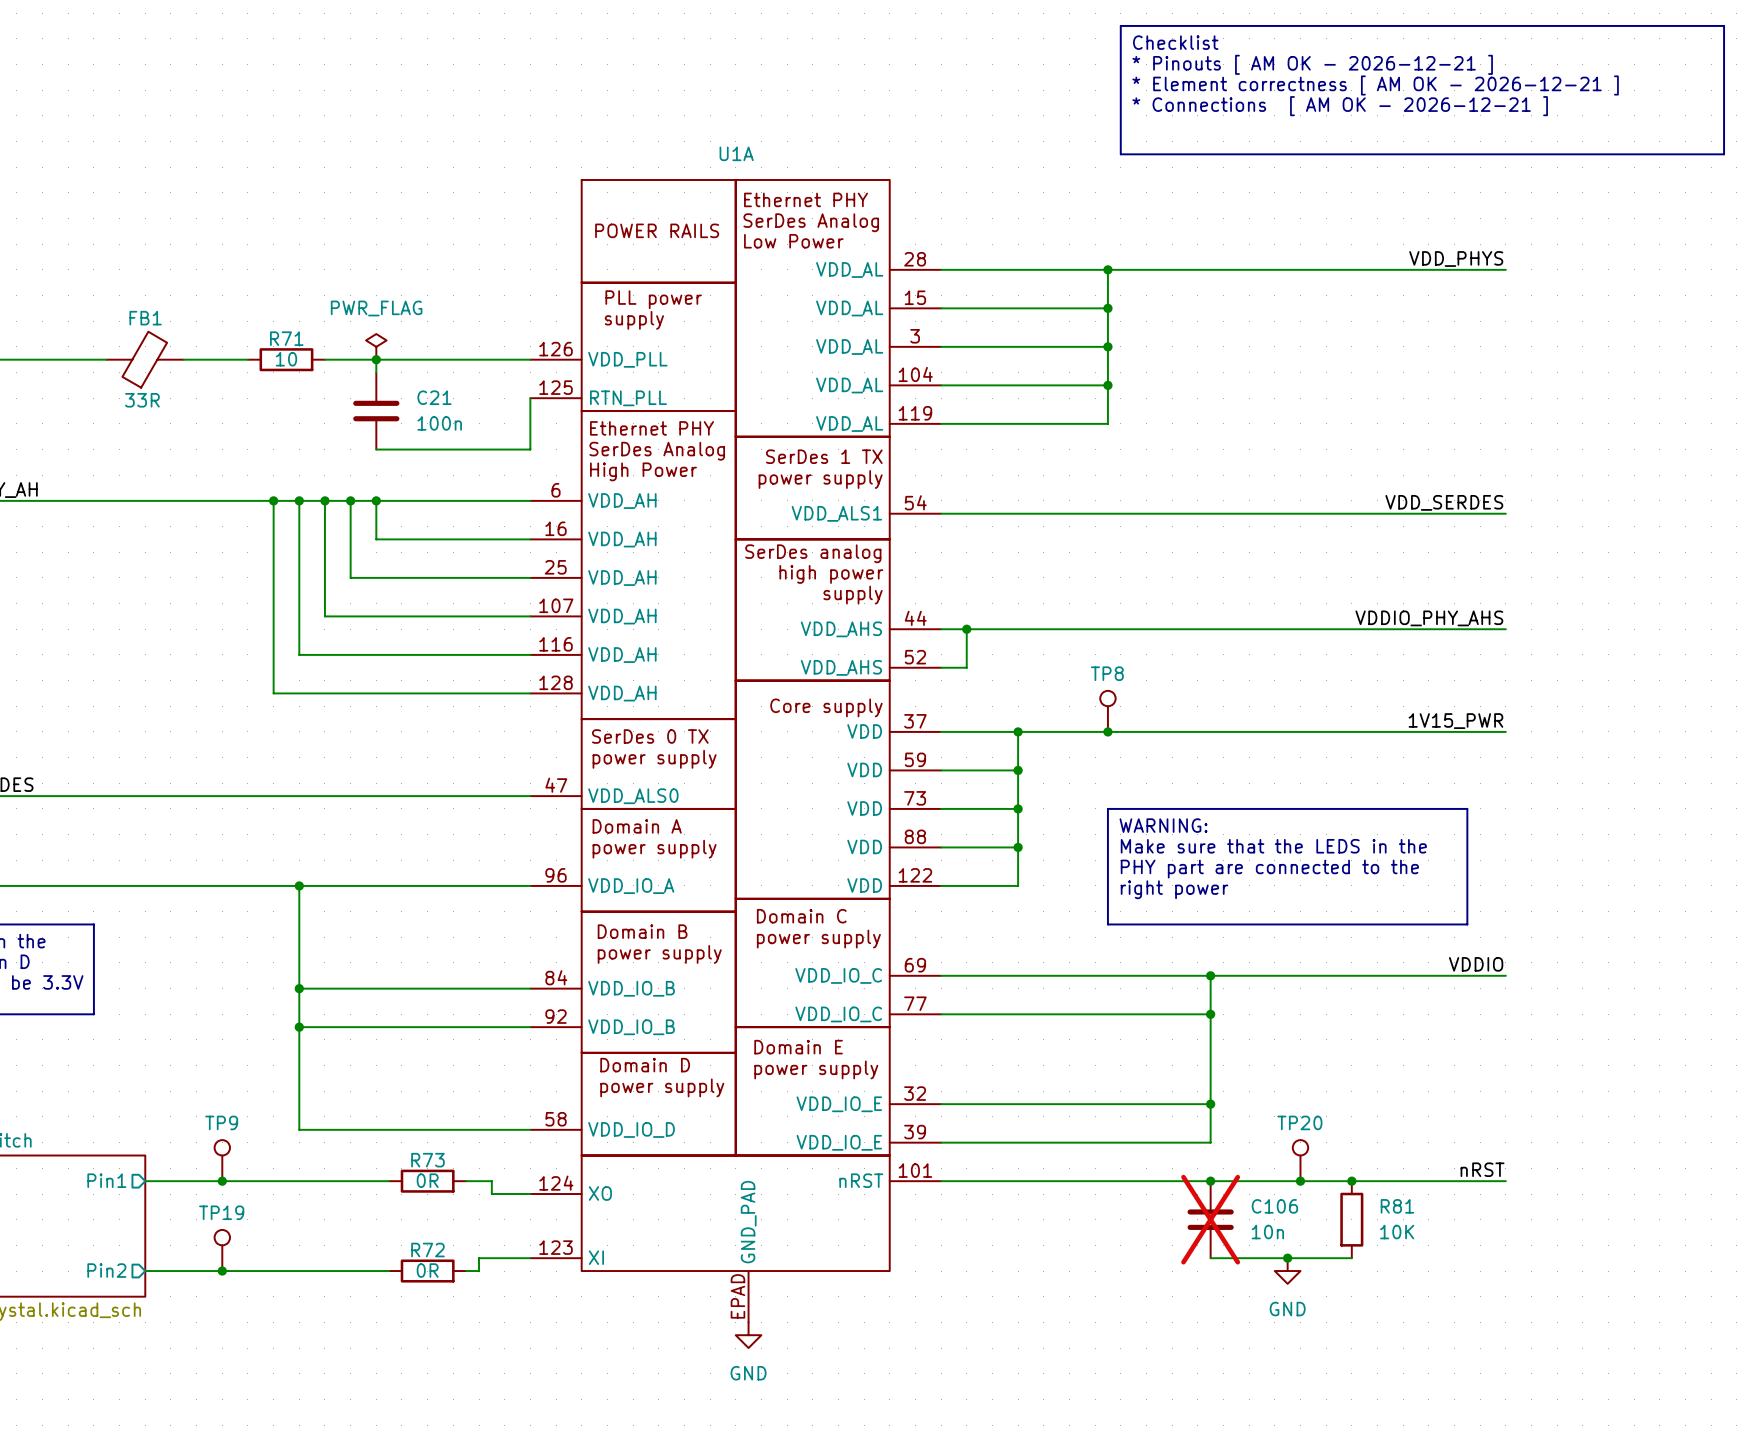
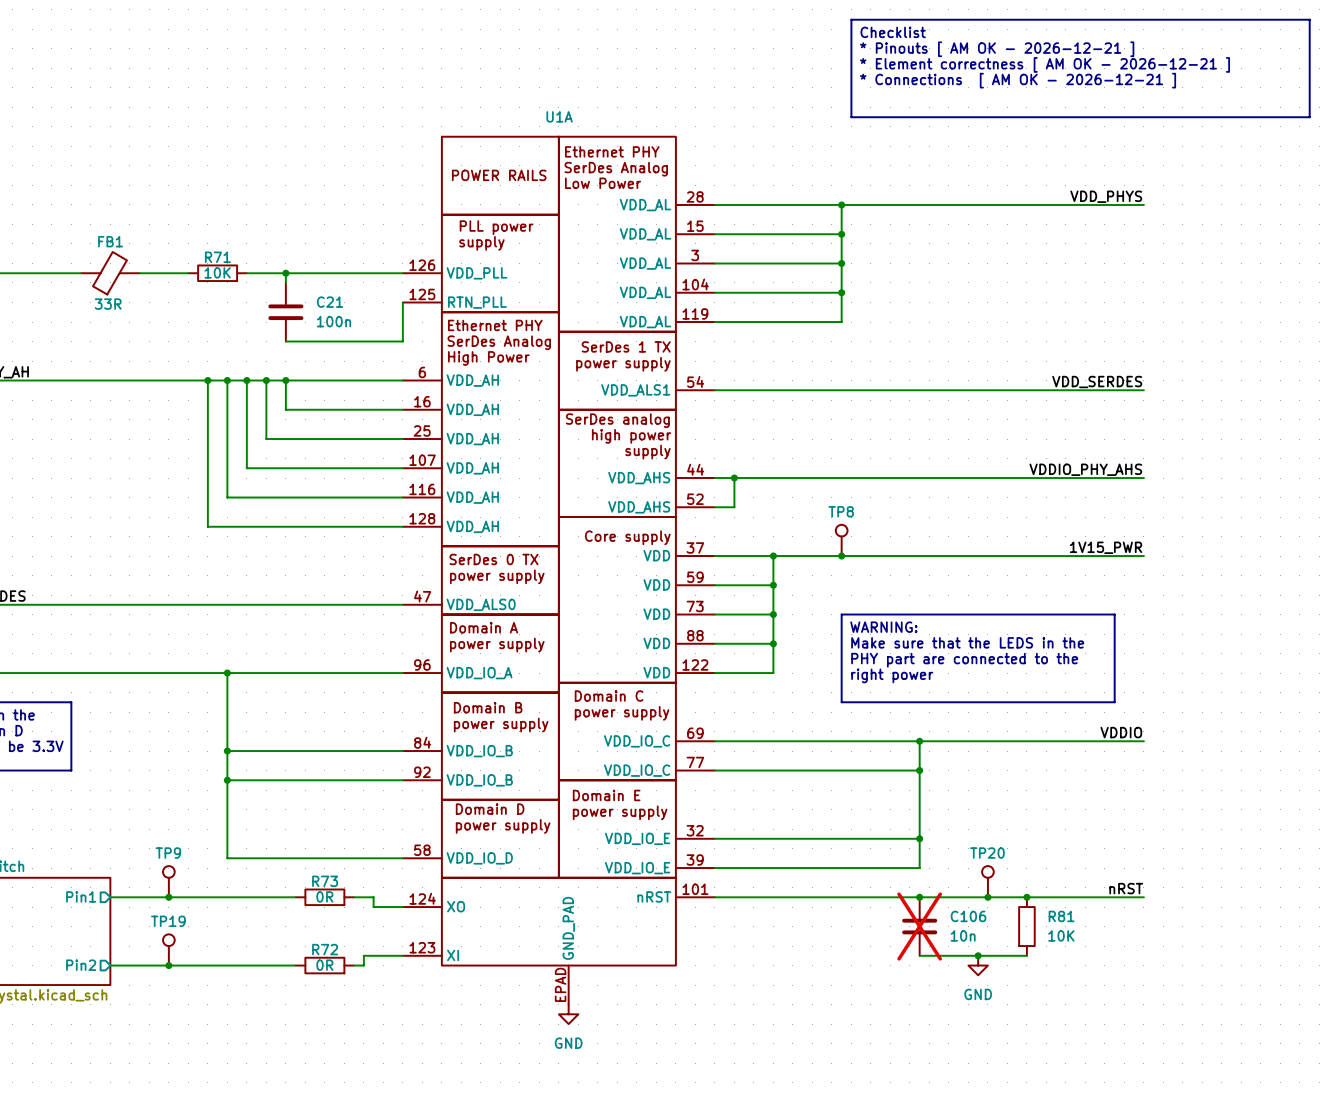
power symbol: PWR_FLAG (376, 346) -> none
R71 value: 10 (286, 359) -> 10K (217, 272)

